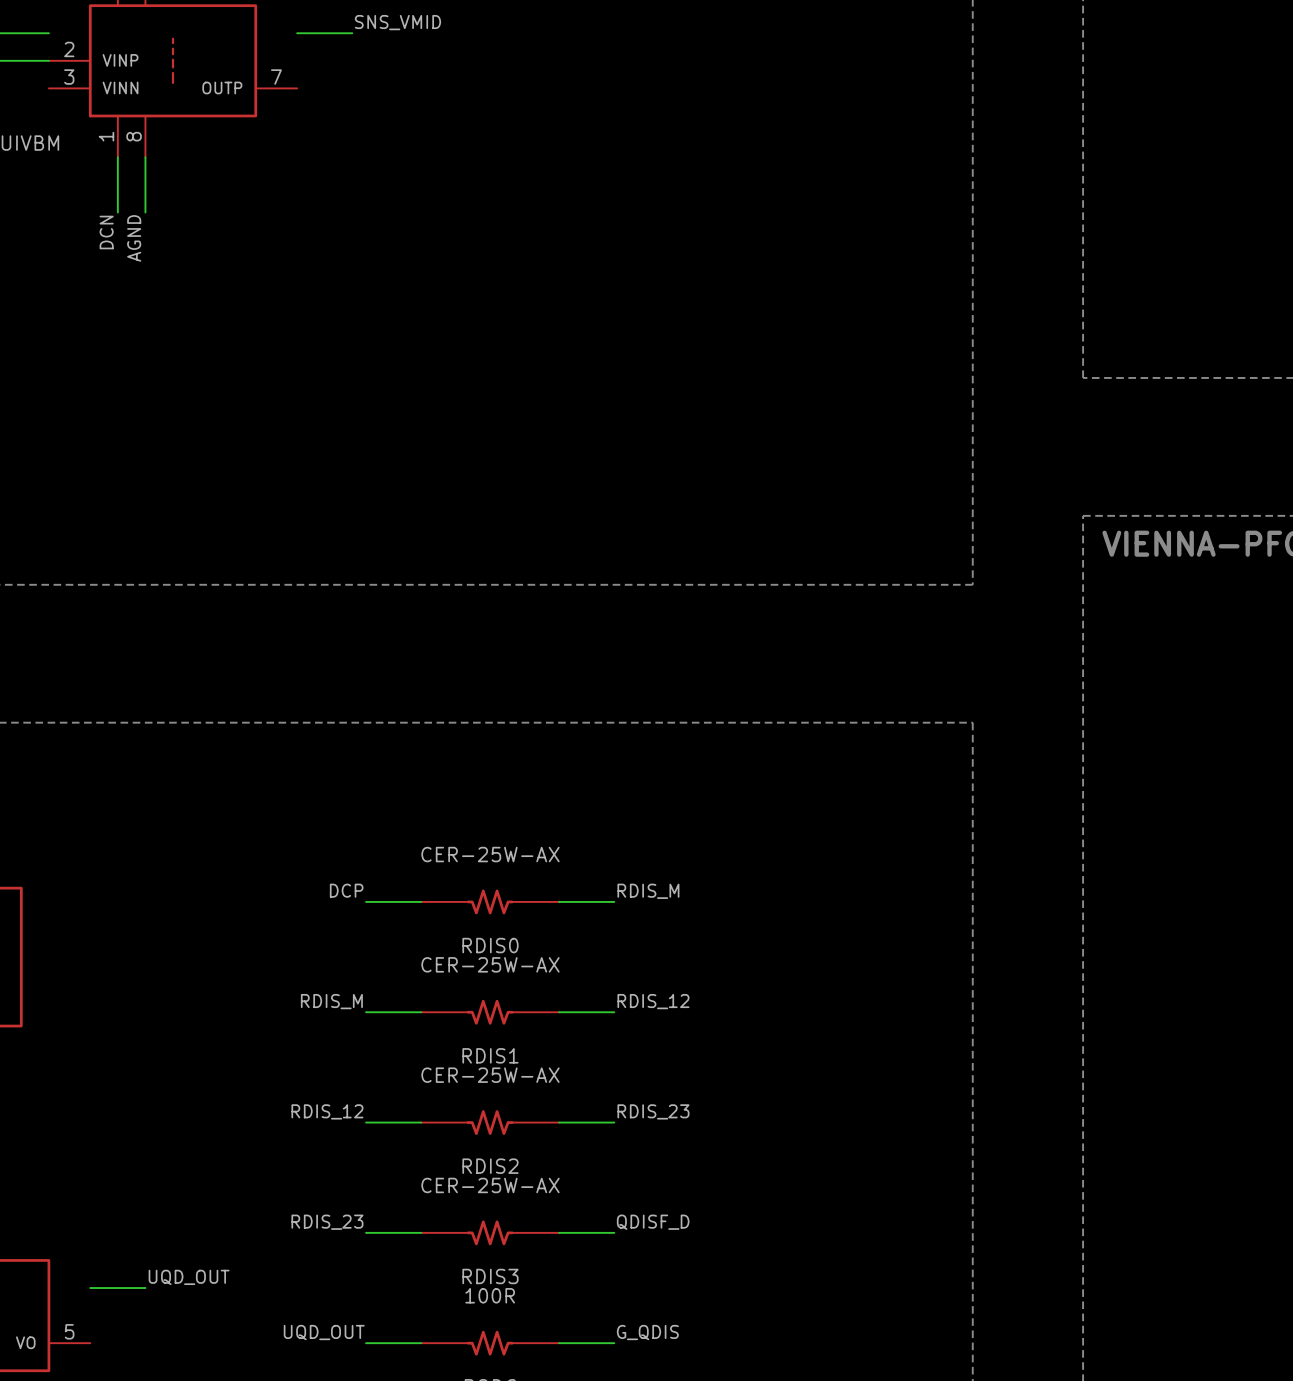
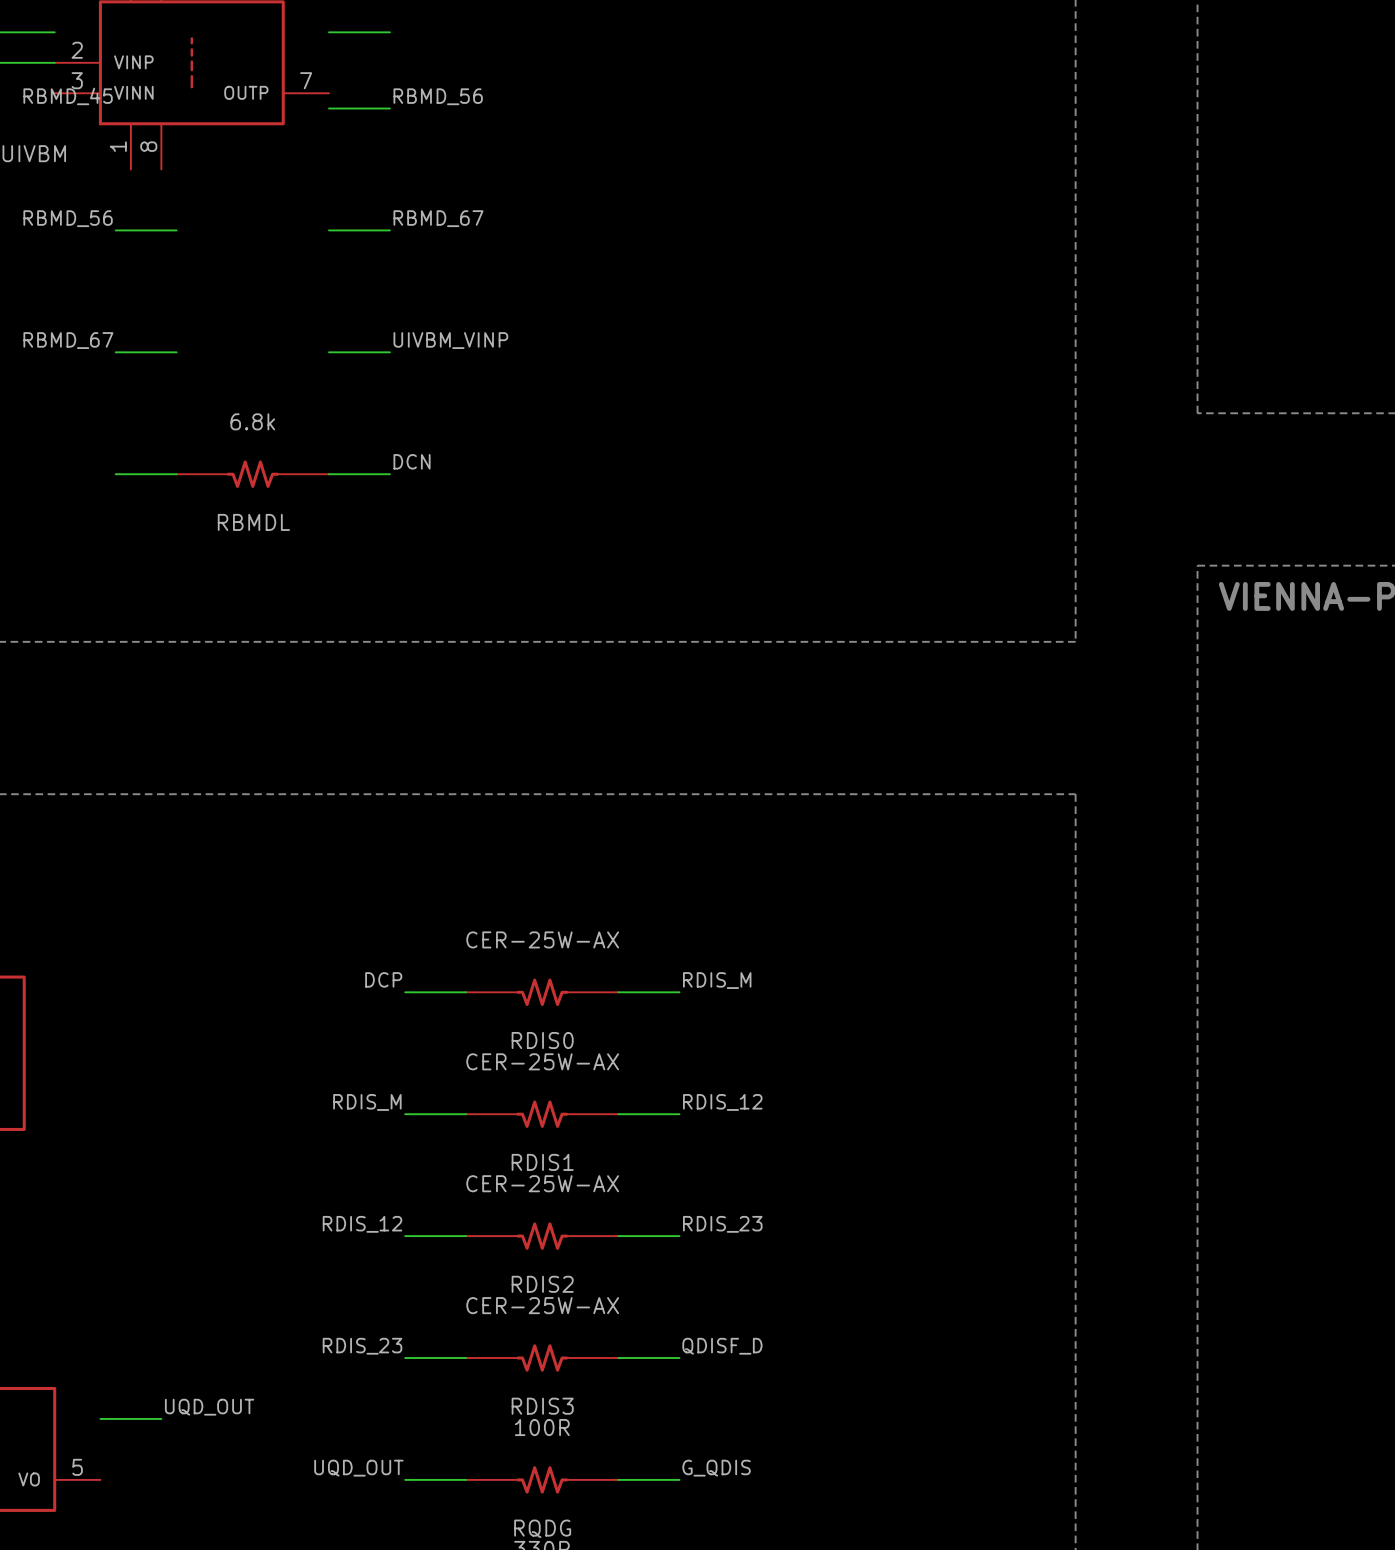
label: SNS_VMID (397, 22) -> none
label: none -> RBMD_45 (68, 96)
label: none -> RBMD_56 (438, 96)
wire: none -> (328, 108) (389, 108)
wire: (117, 157) (117, 212) -> none
wire: (145, 157) (145, 212) -> none
label: none -> RBMD_56 (68, 218)
label: none -> RBMD_67 (438, 218)
wire: none -> (115, 230) (176, 230)
wire: none -> (328, 230) (389, 230)
label: DCN (106, 232) -> none
label: AGND (134, 238) -> none
label: none -> RBMD_67 (68, 340)
label: none -> UIVBM_VINP (450, 340)
wire: none -> (115, 352) (176, 352)
wire: none -> (328, 352) (389, 352)
label: none -> DCN (412, 461)
wire: none -> (115, 474) (176, 474)
RBMDL: none -> 6.8k (252, 474)
wire: none -> (328, 474) (389, 474)

